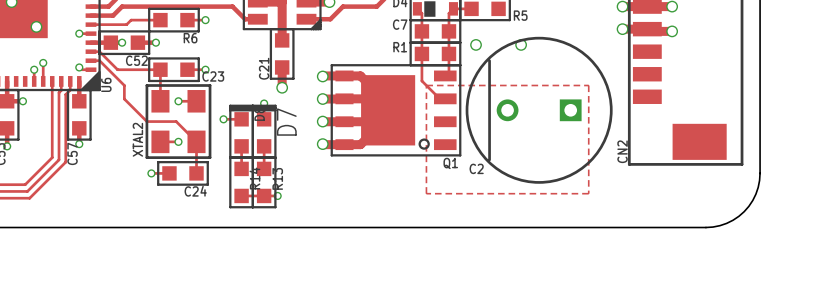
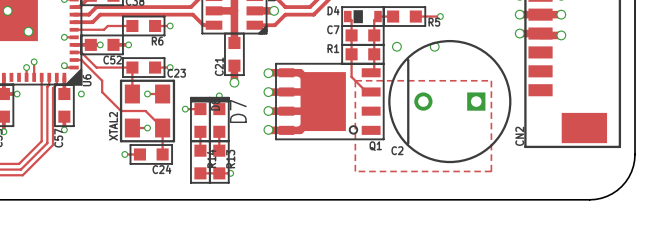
track: none -> (415, 16) (440, 16)
via: none -> (440, 16)
via: none -> (81, 94)

